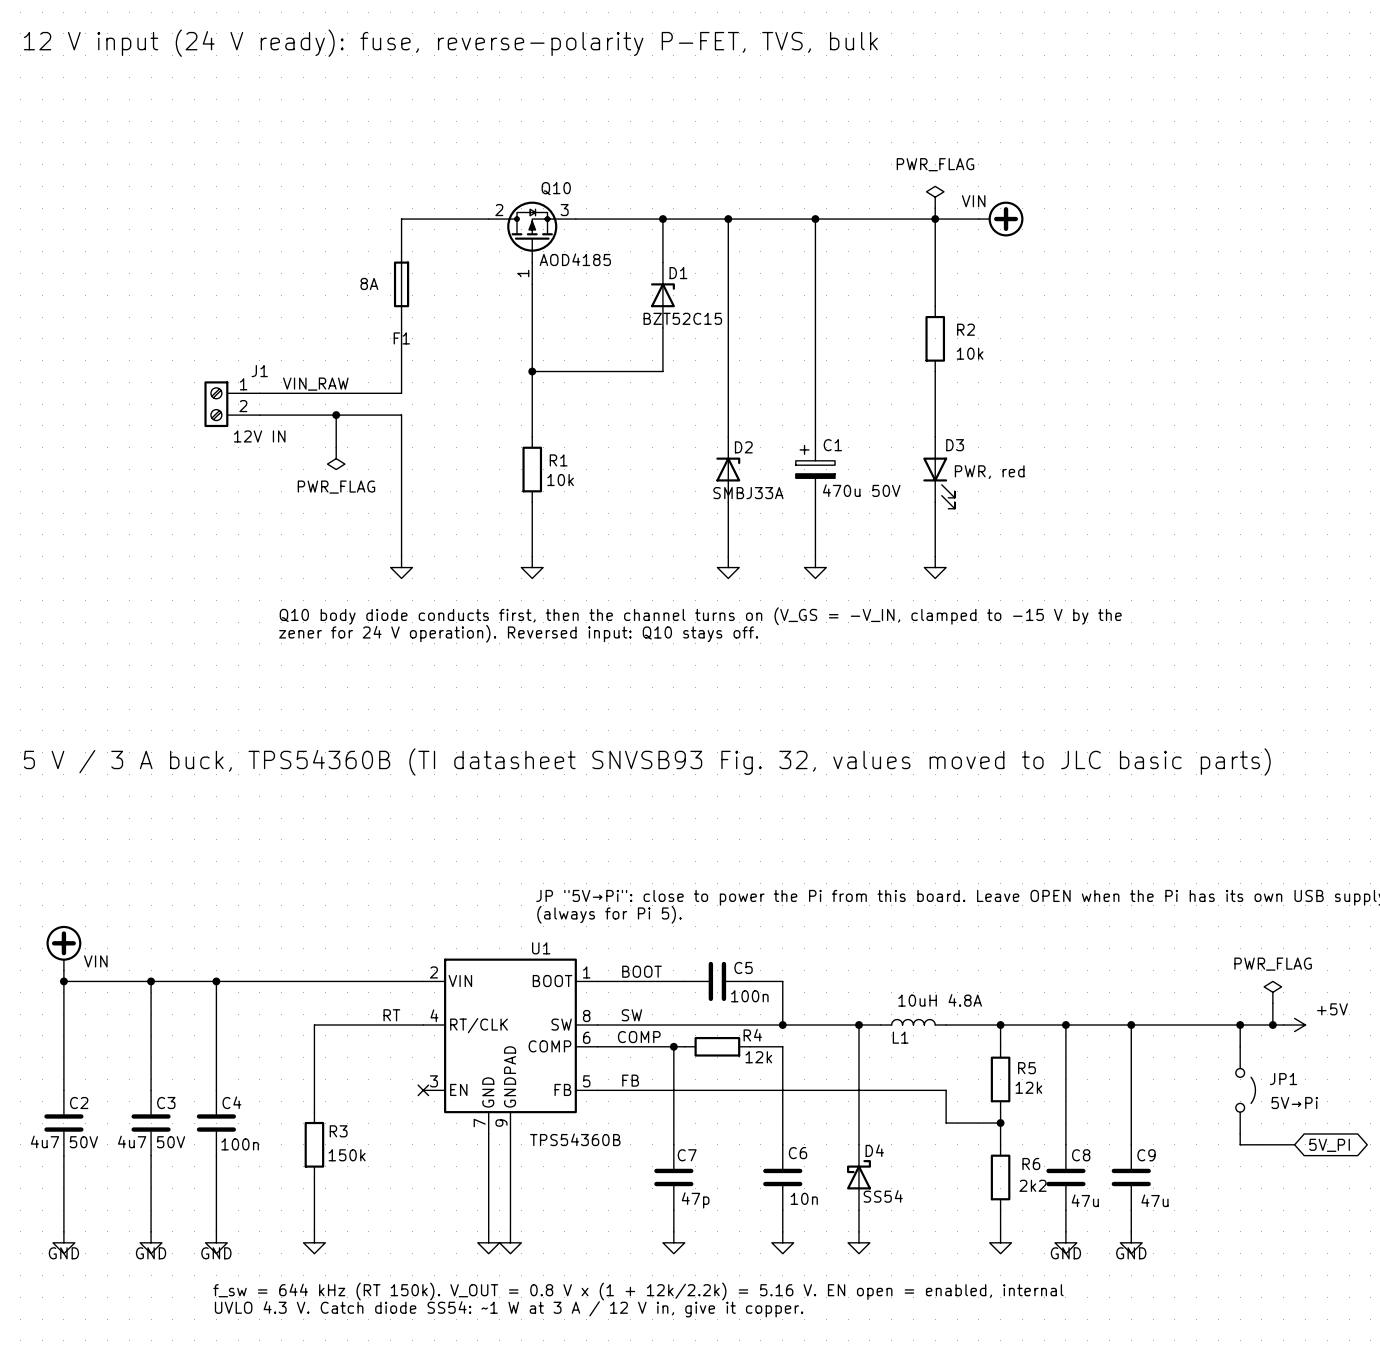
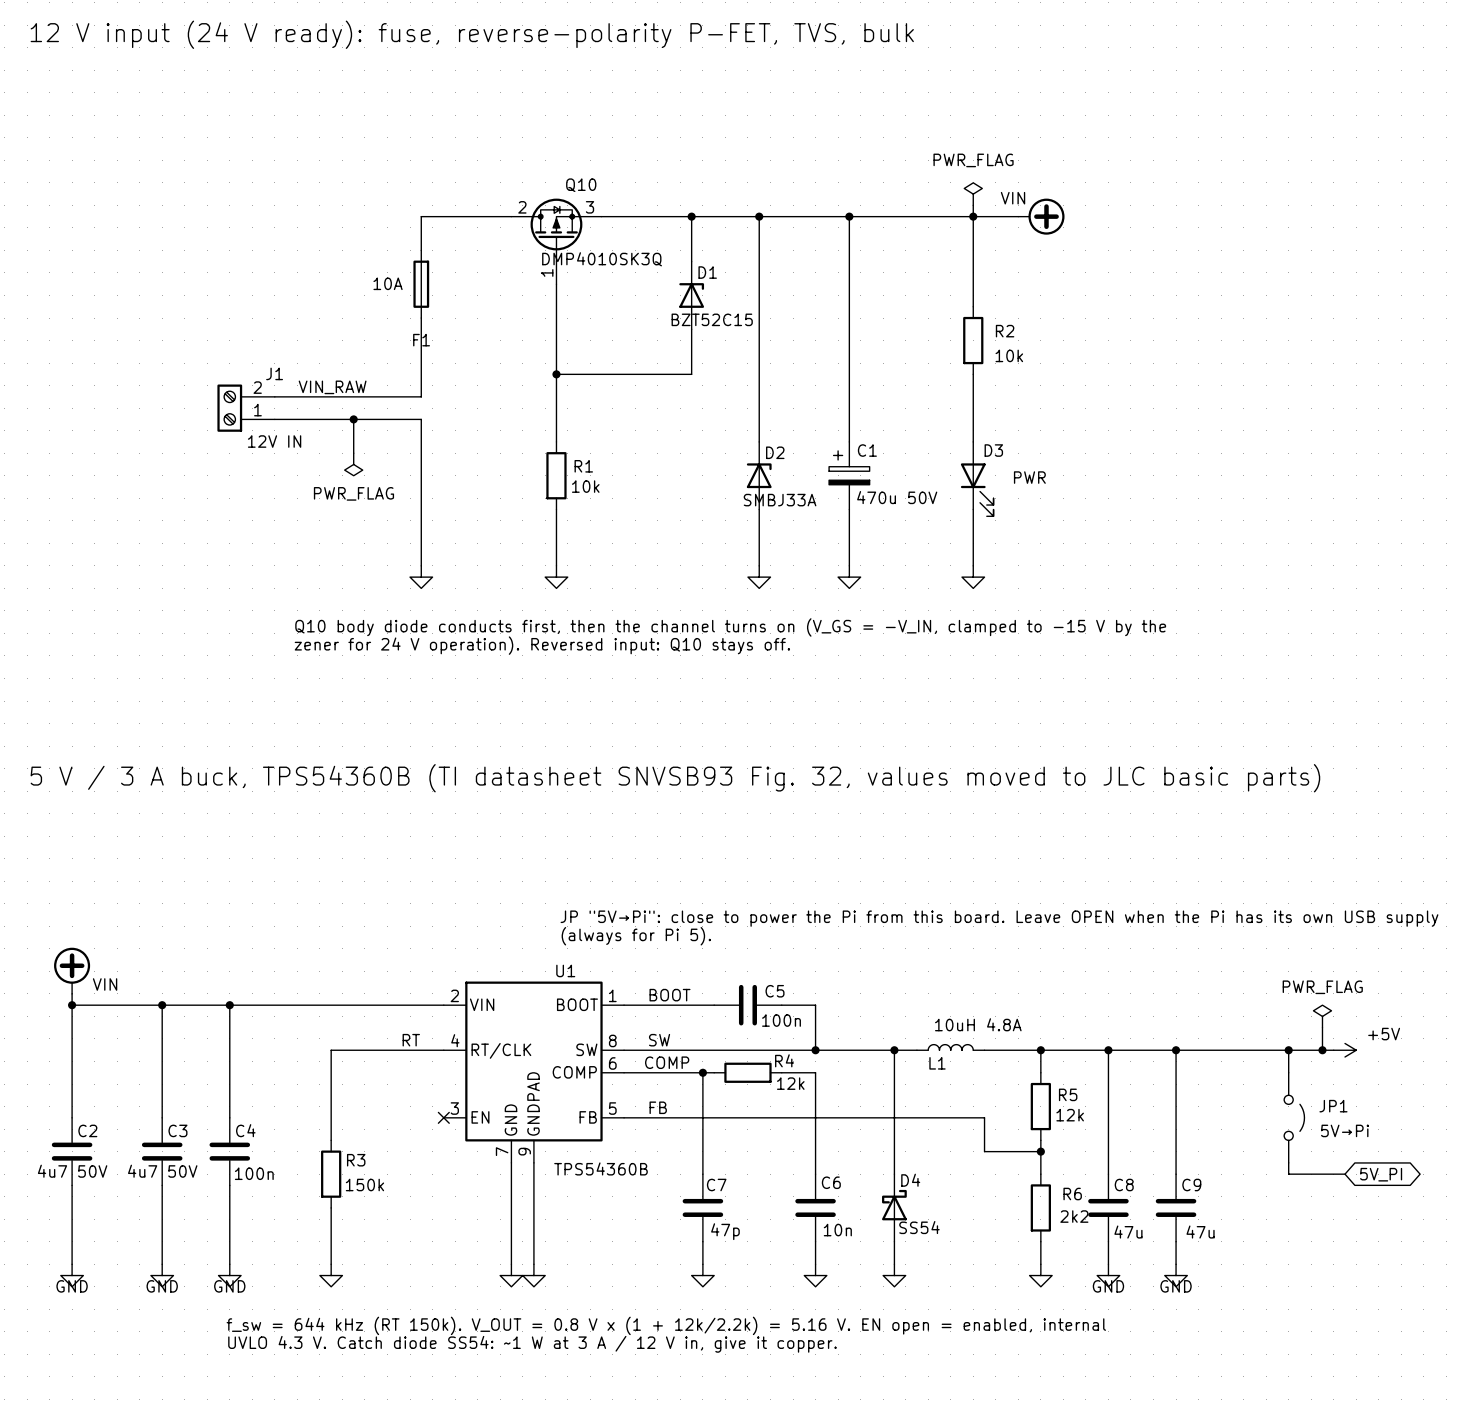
Q10 value: AOD4185 (575, 259) -> DMP4010SK3Q (602, 259)
F1 value: 8A (369, 283) -> 10A (388, 283)
J1 flip: as is (216, 404) -> up-down (229, 408)
D3 value: PWR, red (989, 472) -> PWR (1029, 477)

